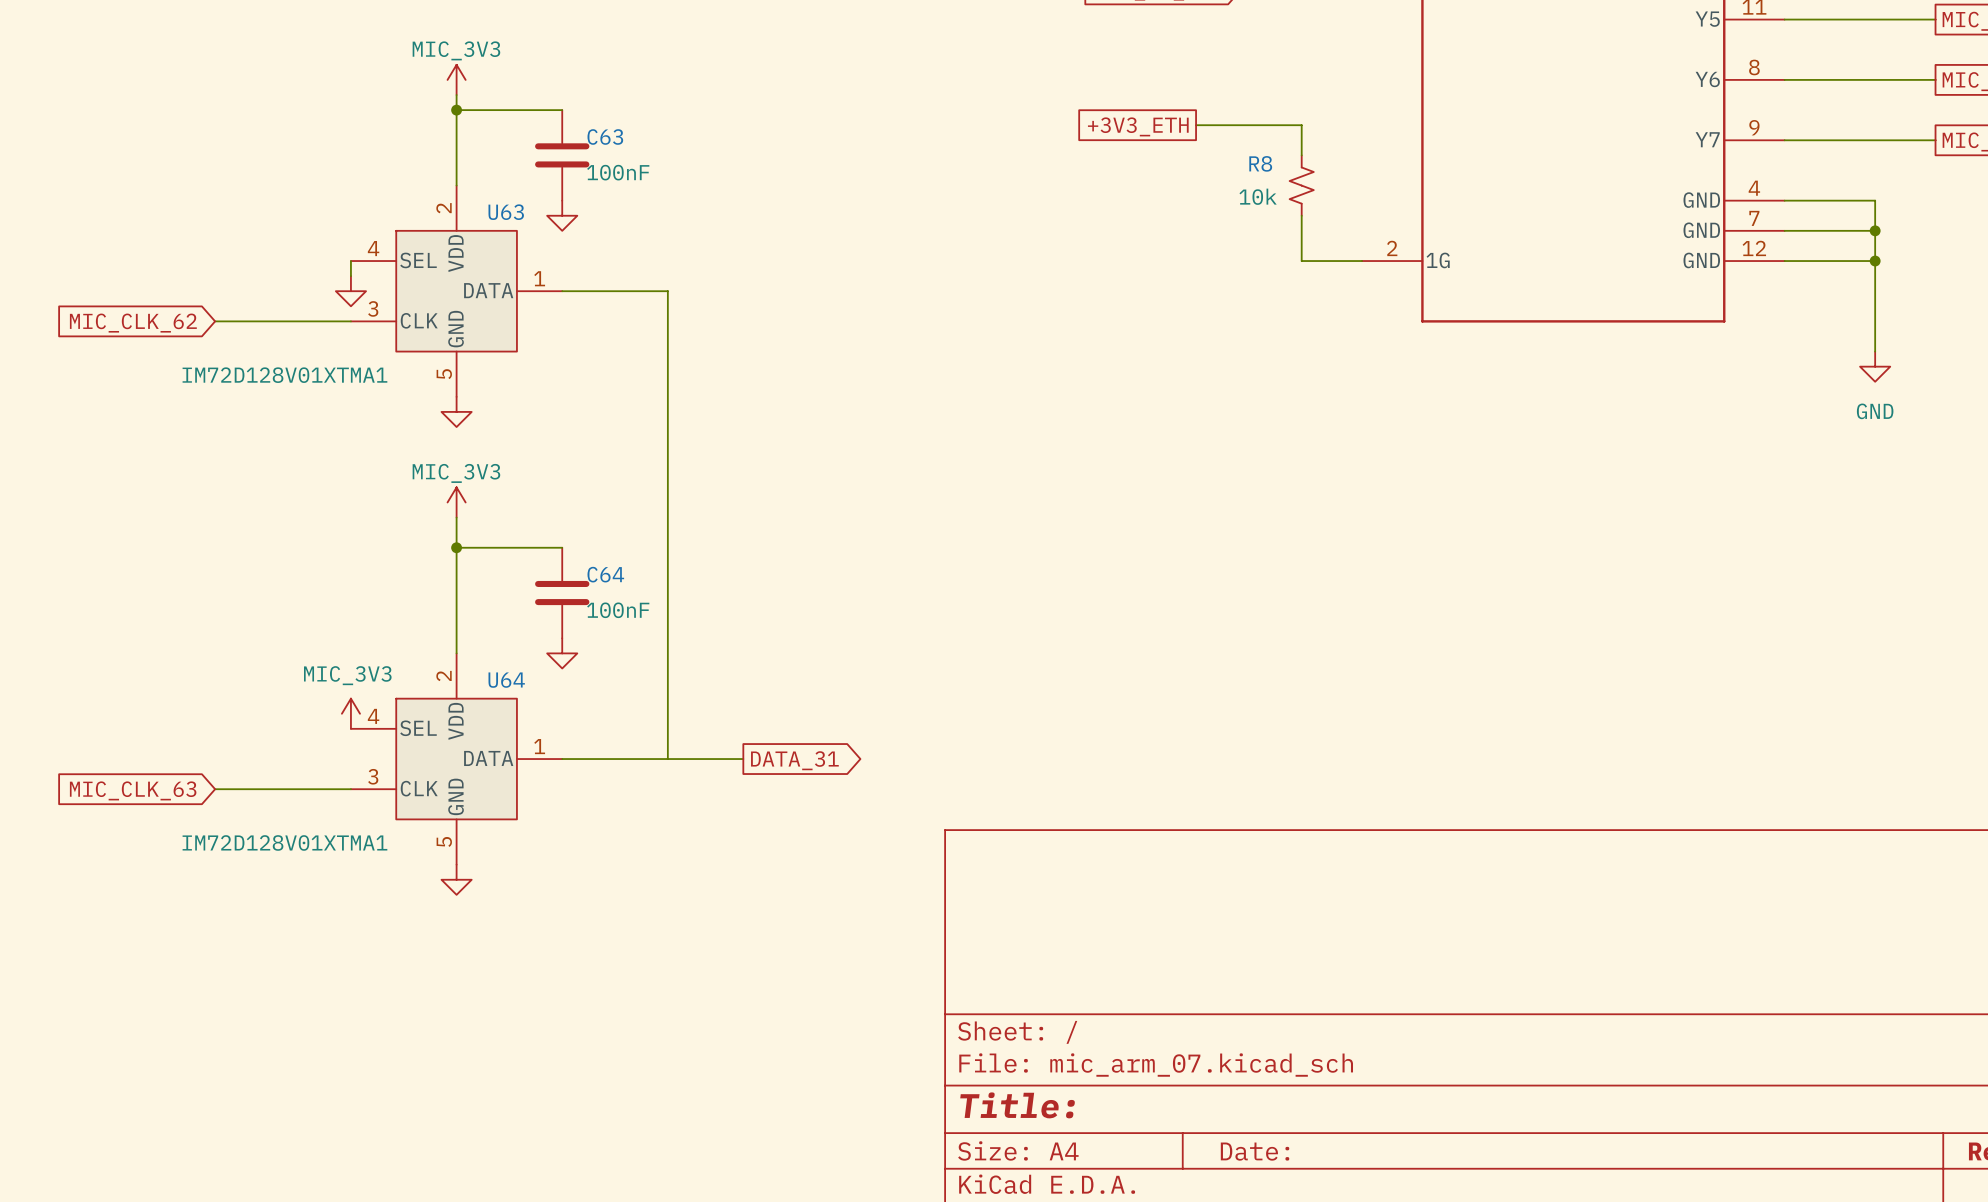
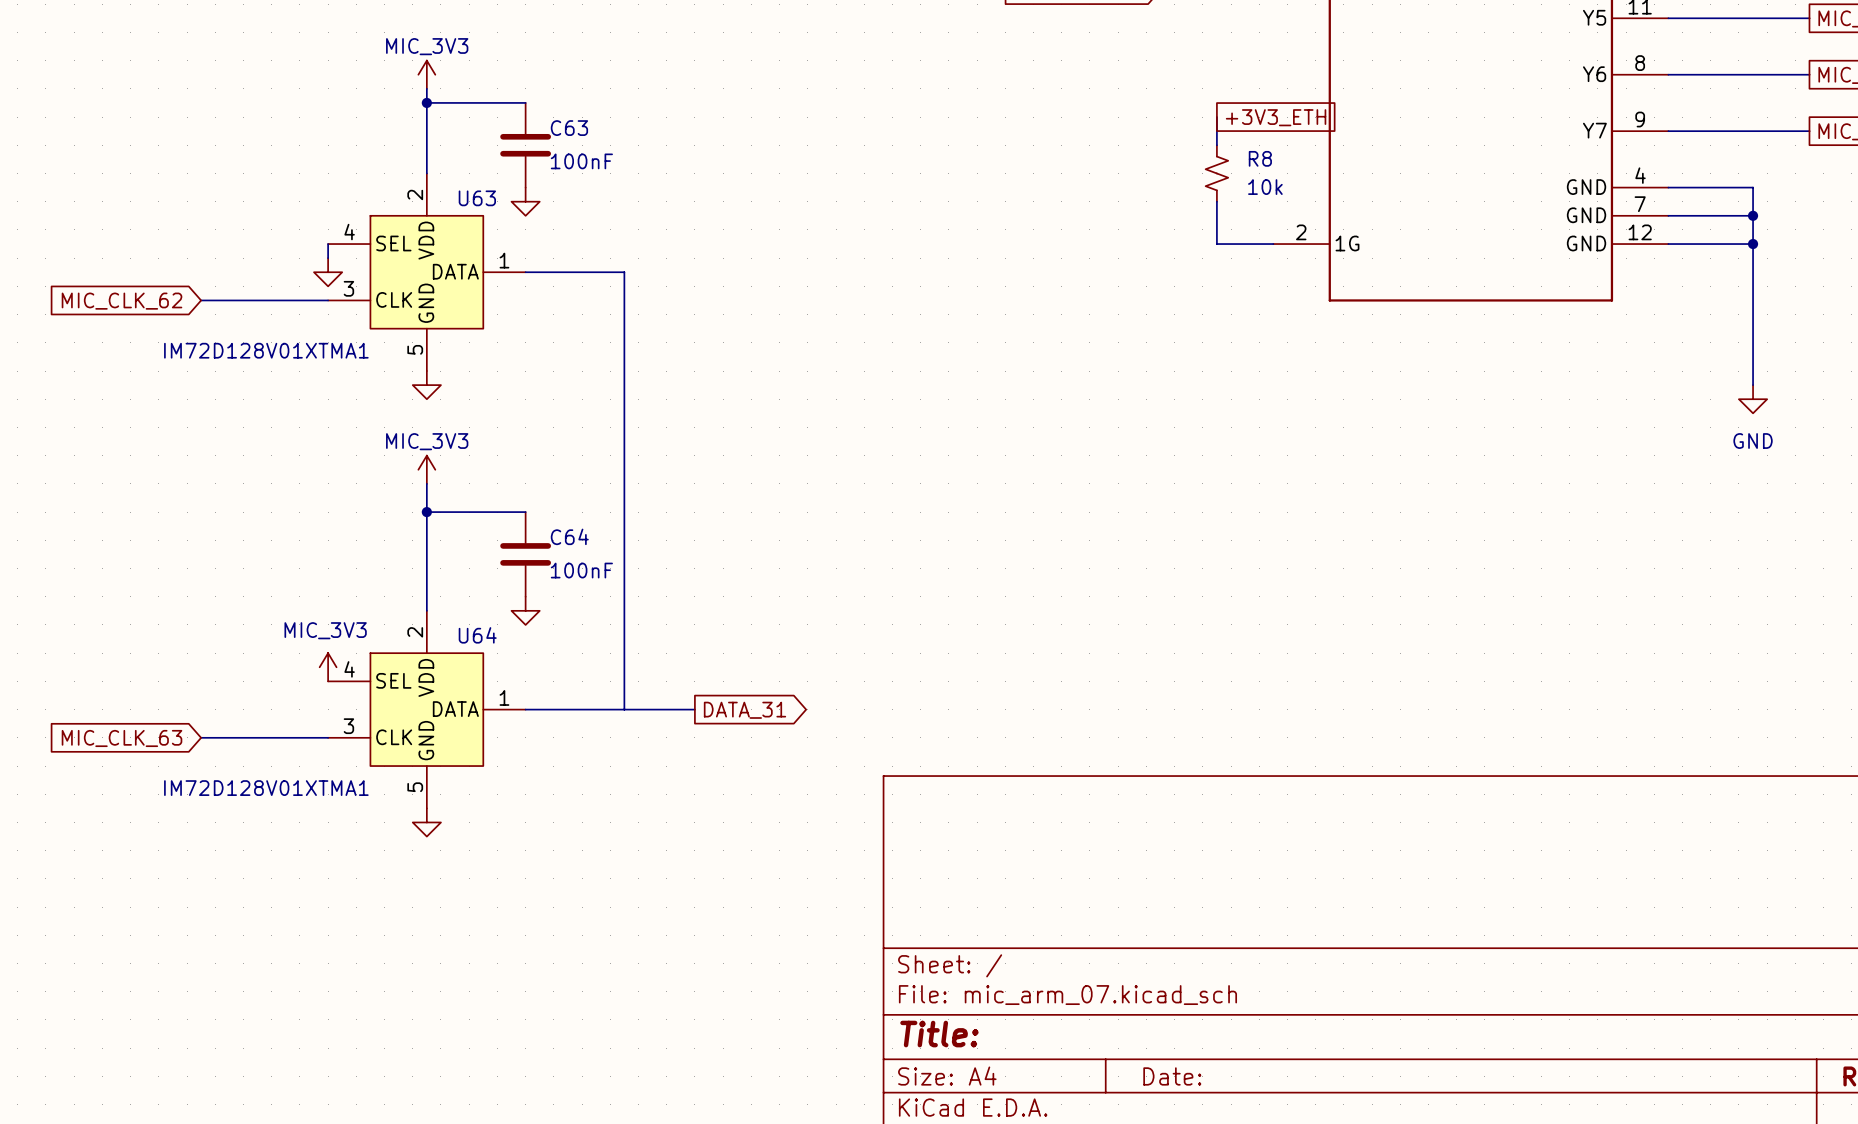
wire: (1196, 125) (1301, 125) -> none
global label rotation: 0° (1138, 126) -> 180° (1276, 117)
global label position: +3V3_ETH (1138, 126) -> +3V3_ETH (1276, 117)
R8 name position: R8 (1260, 163) -> R8 (1260, 158)
R8 value position: 10k (1258, 196) -> 10k (1265, 187)
wire: none -> (1753, 328) (1753, 385)
power symbol position: GND (1875, 366) -> GND (1753, 399)

